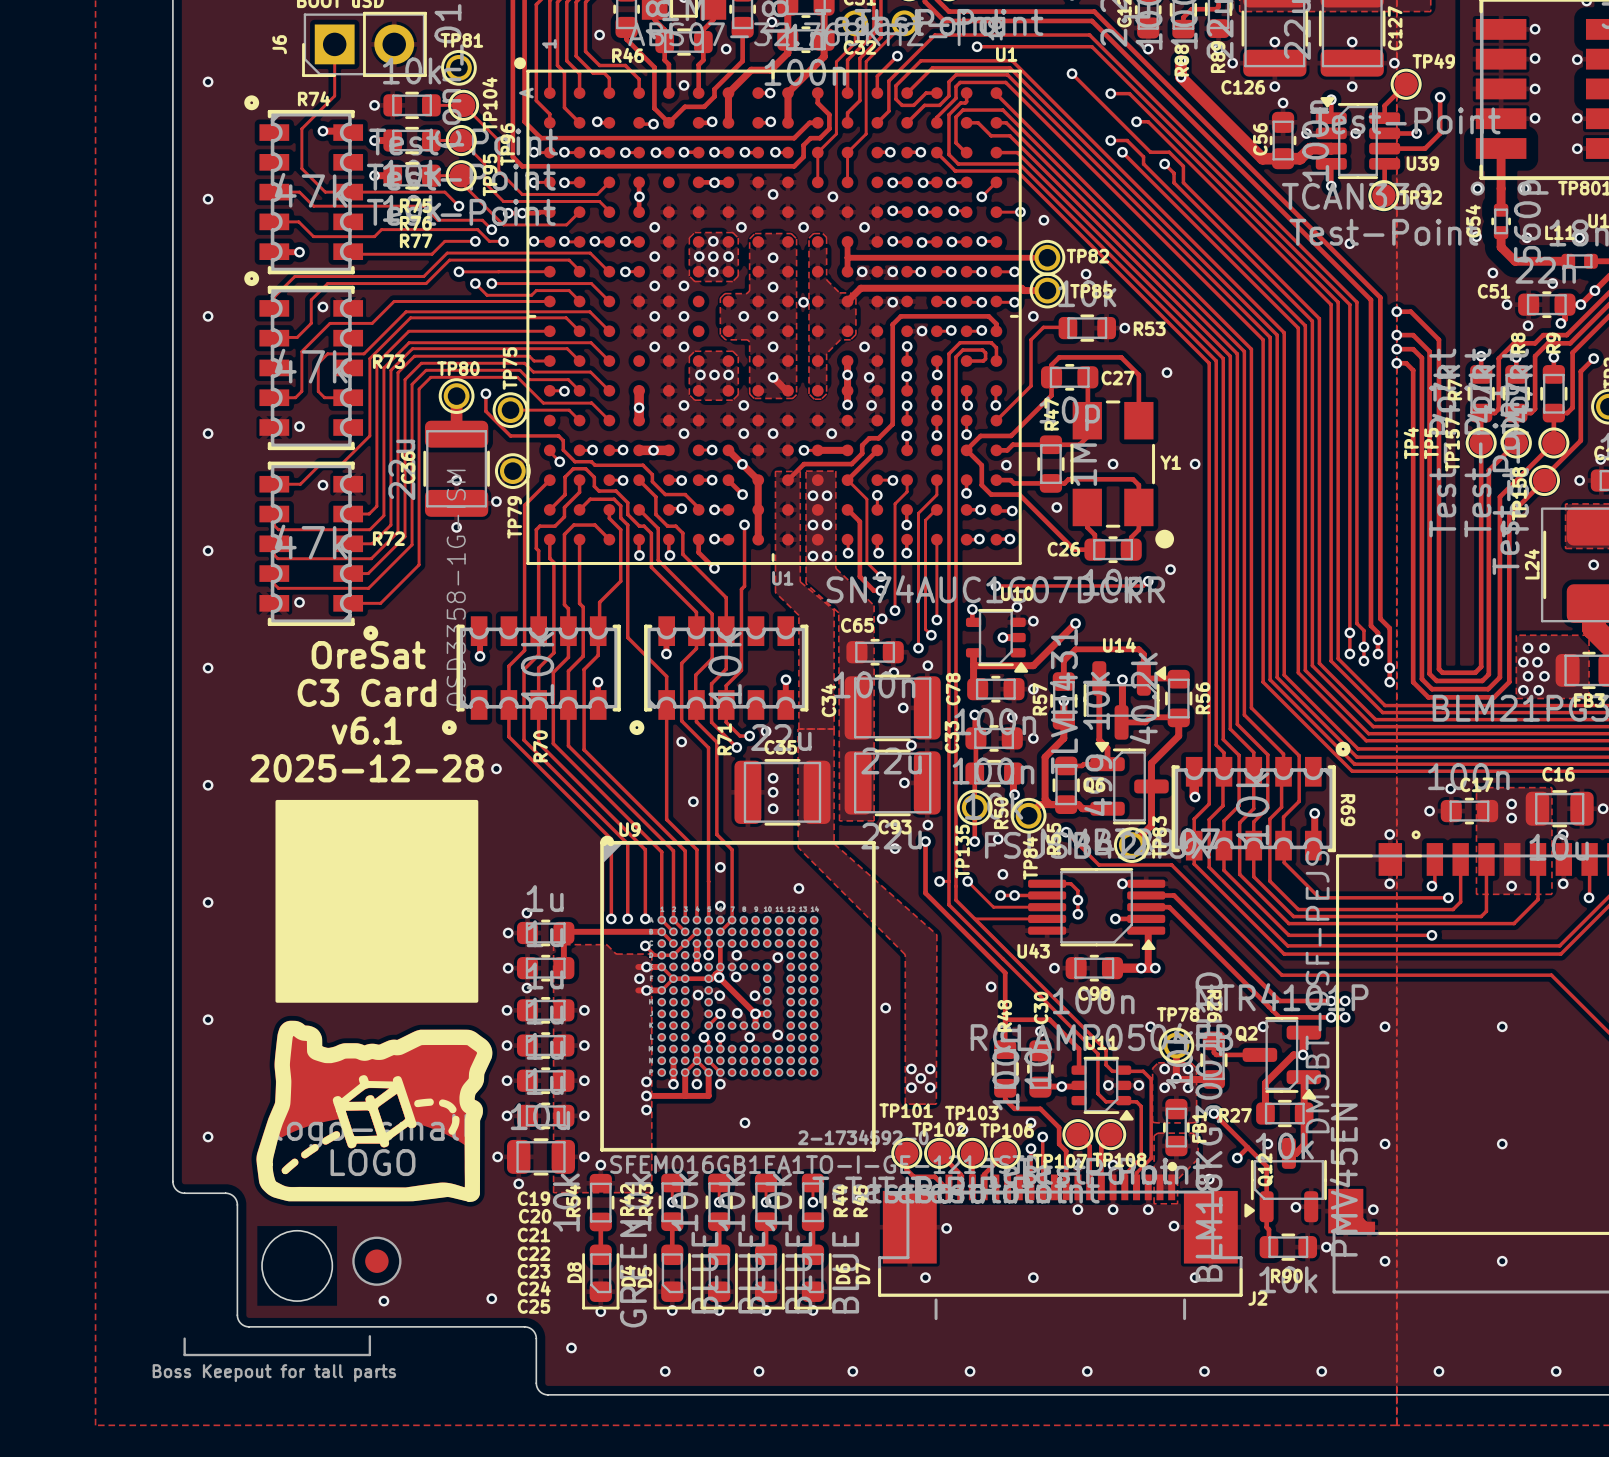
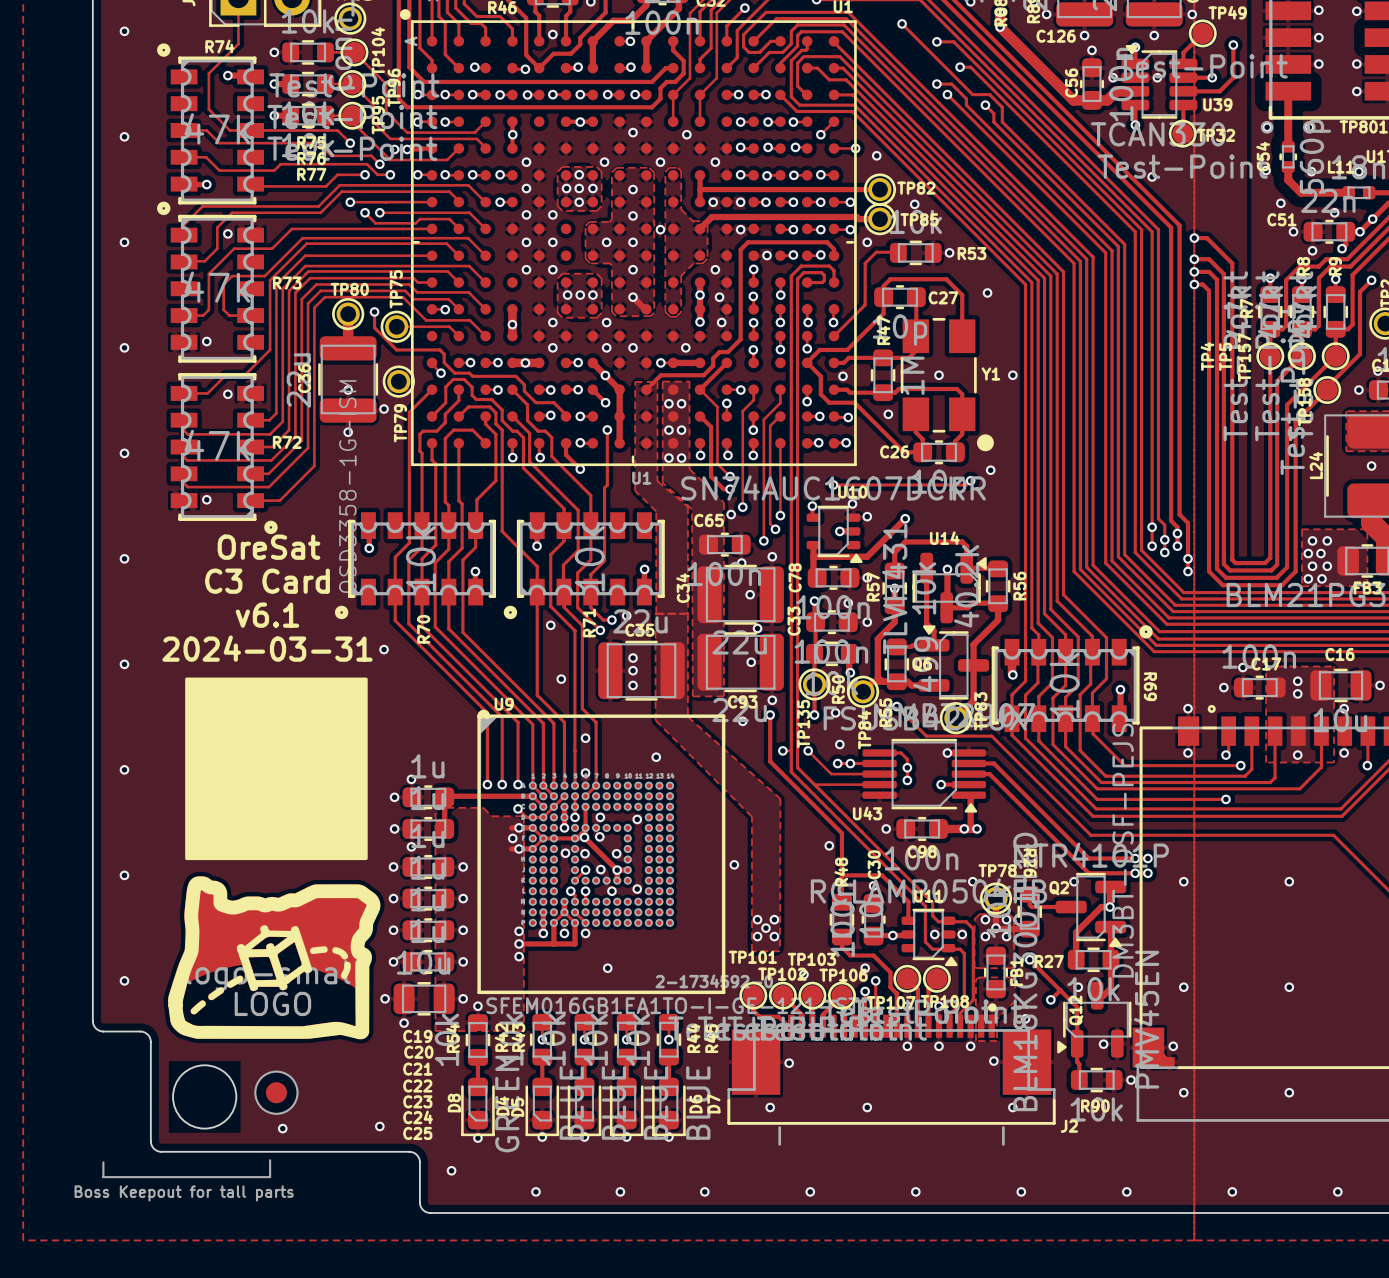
text: 2025-12-28 (366, 768) -> 2024-03-31 (267, 648)

